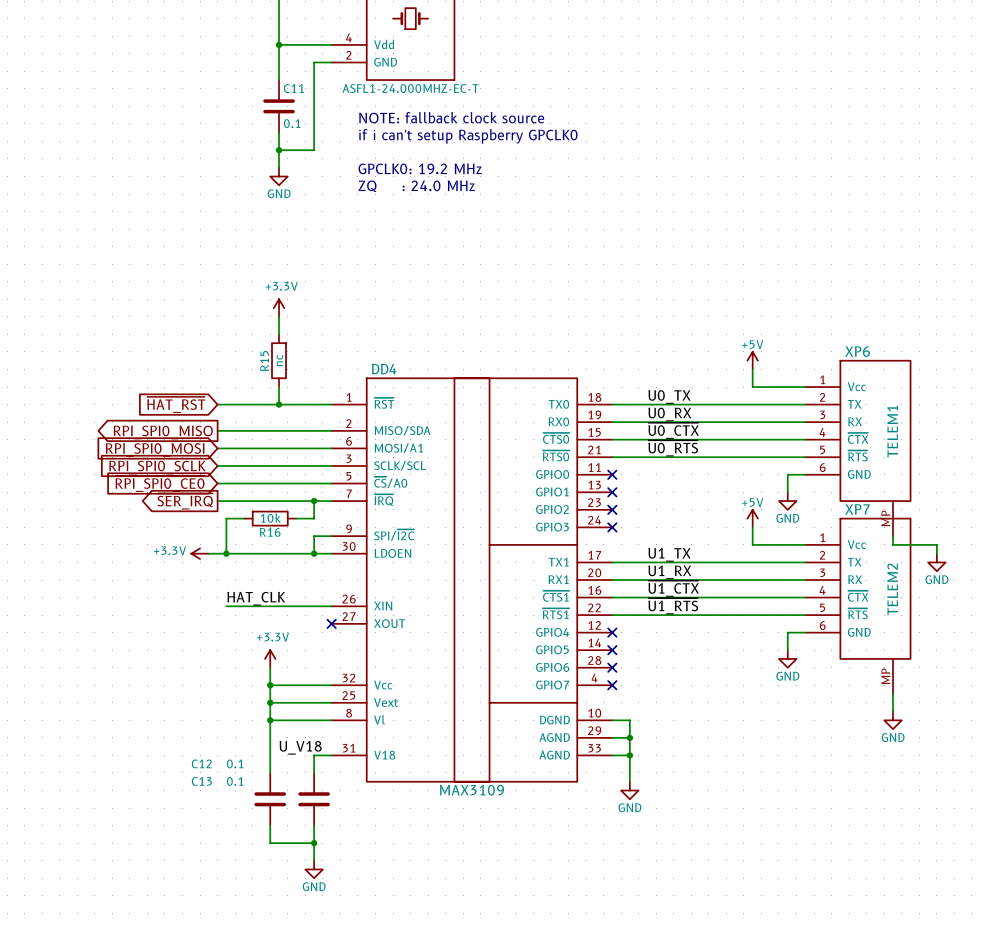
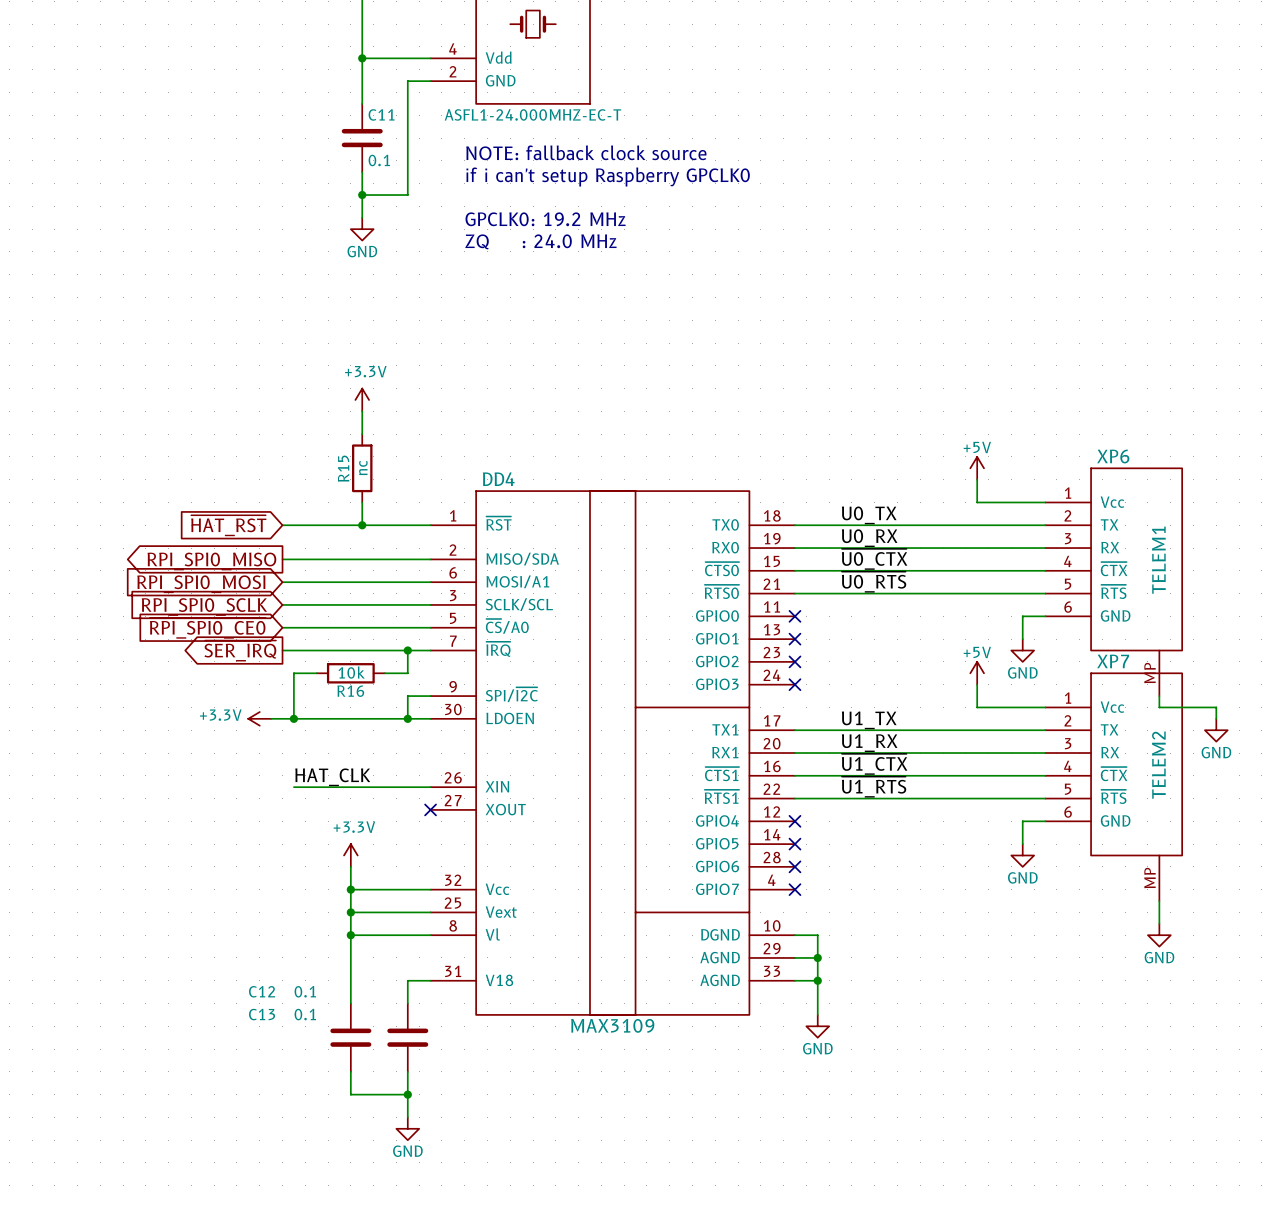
label: U_V18 (300, 747) -> none

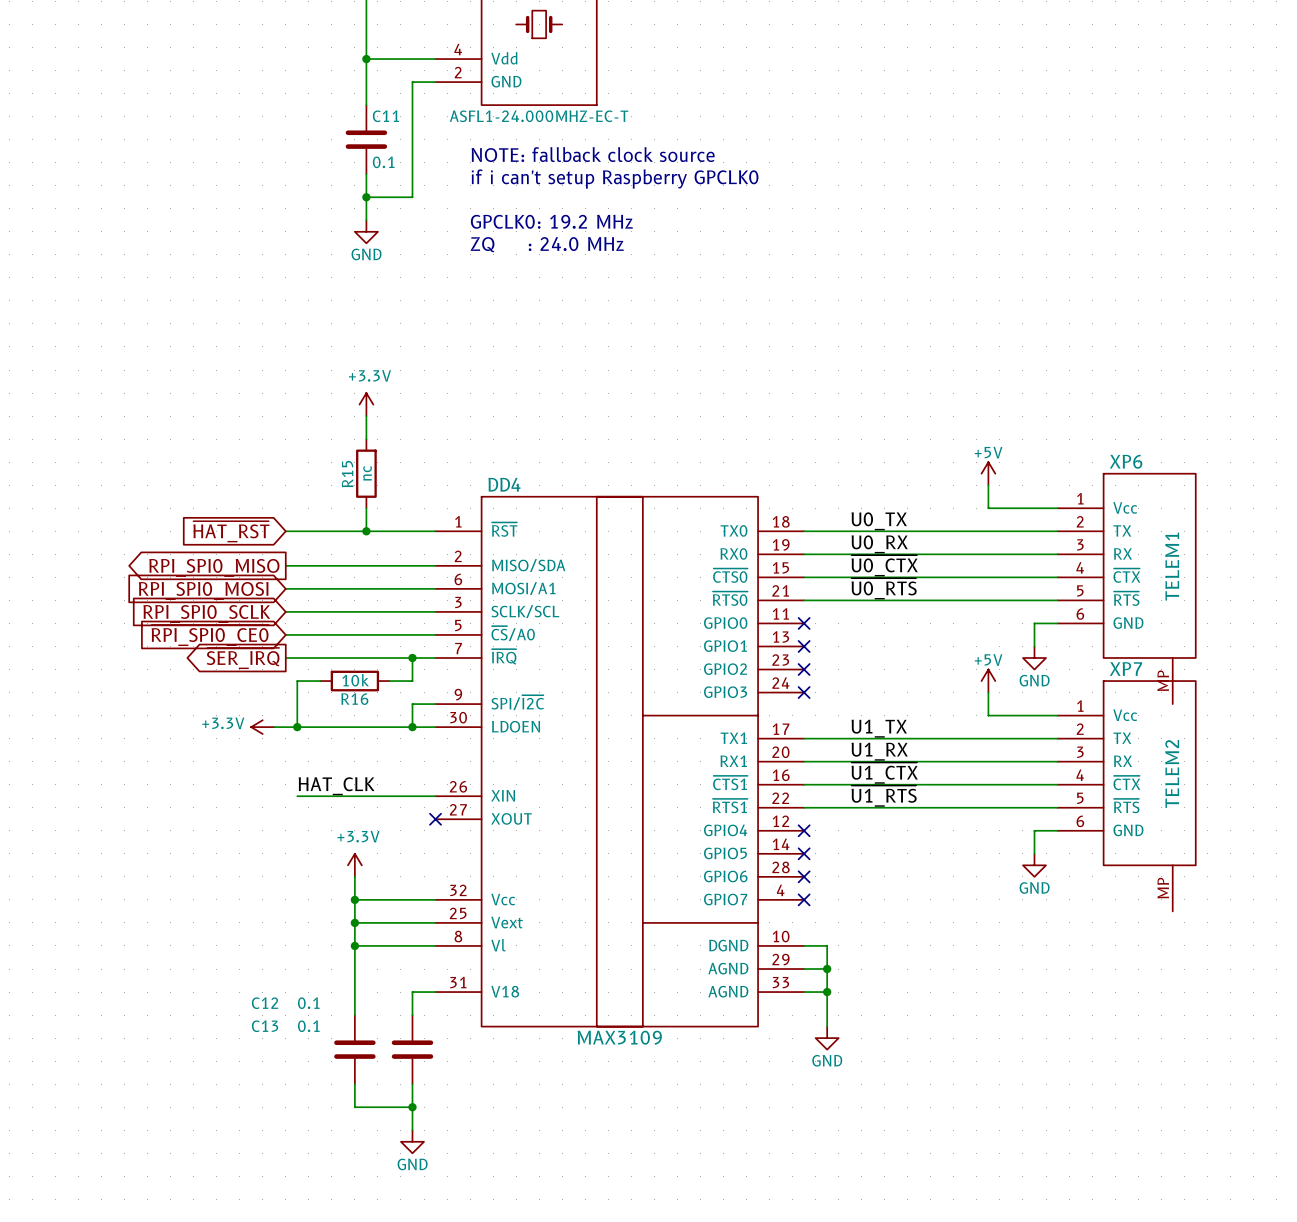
wire: (1159, 696) (1159, 707) (1216, 707) (1216, 718) -> none
power symbol: GND (1216, 730) -> none
wire: (1159, 901) (1159, 923) -> none
power symbol: GND (1159, 935) -> none

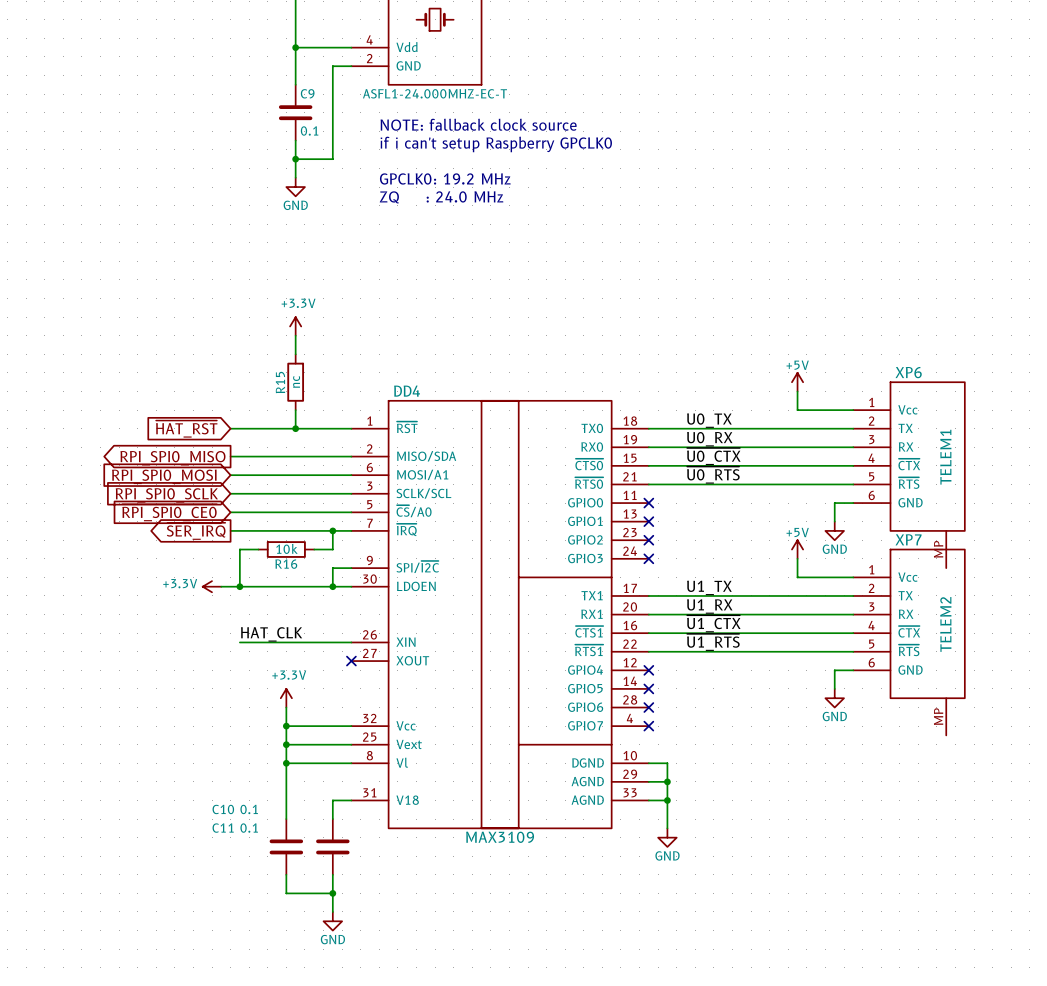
C11 name: C11 (385, 116) -> C9 (307, 93)
C12 name: C12 (265, 1003) -> C10 (223, 809)
C13 name: C13 (265, 1026) -> C11 (223, 828)

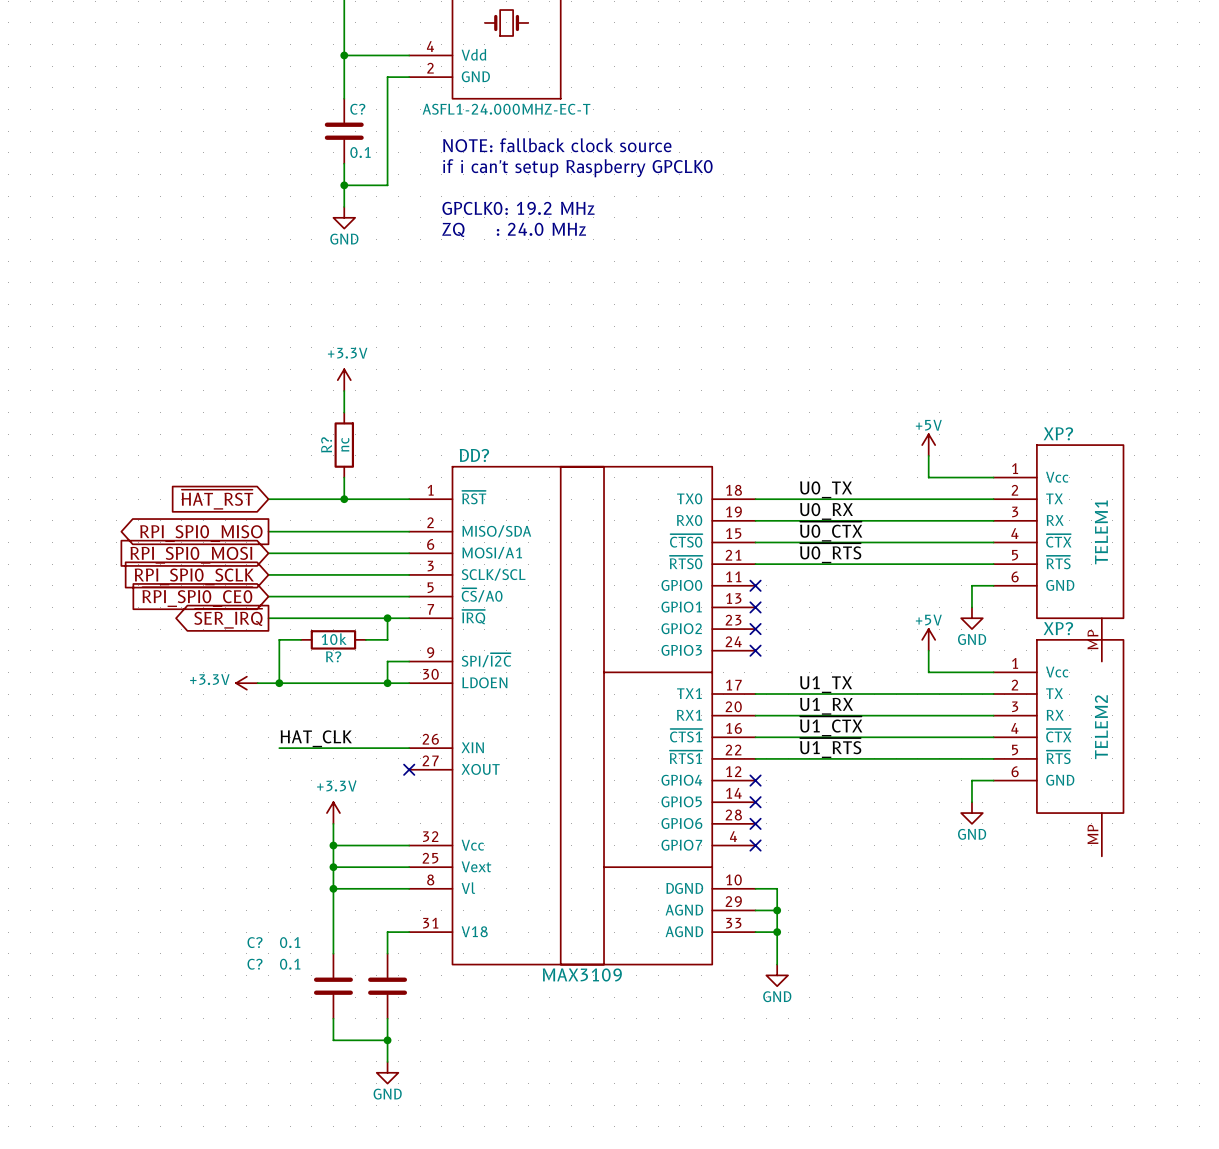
C9 name: C9 (307, 93) -> C? (357, 109)
XP6 name: XP6 (908, 372) -> XP? (1058, 433)
R15 name: R15 (280, 382) -> R? (326, 444)
DD4 name: DD4 (407, 391) -> DD? (474, 455)
XP7 name: XP7 (908, 539) -> XP? (1058, 628)
R16 name: R16 (286, 564) -> R? (333, 656)
C10 name: C10 (223, 809) -> C? (255, 942)
C11 name: C11 (223, 828) -> C? (255, 964)

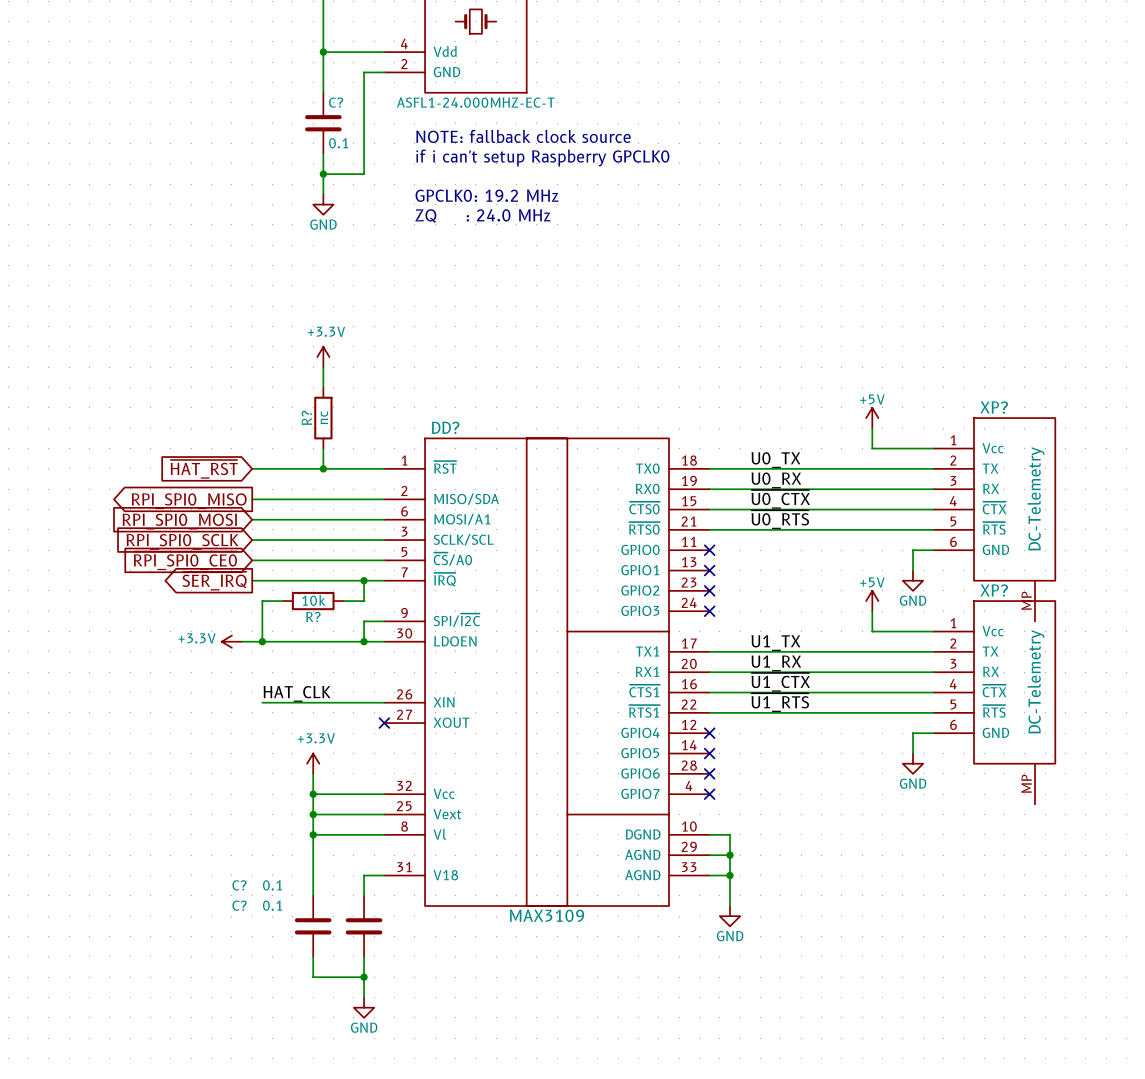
XP? value: TELEM1 (1101, 532) -> DC-Telemetry (1036, 498)
XP? value: TELEM2 (1101, 727) -> DC-Telemetry (1036, 681)

